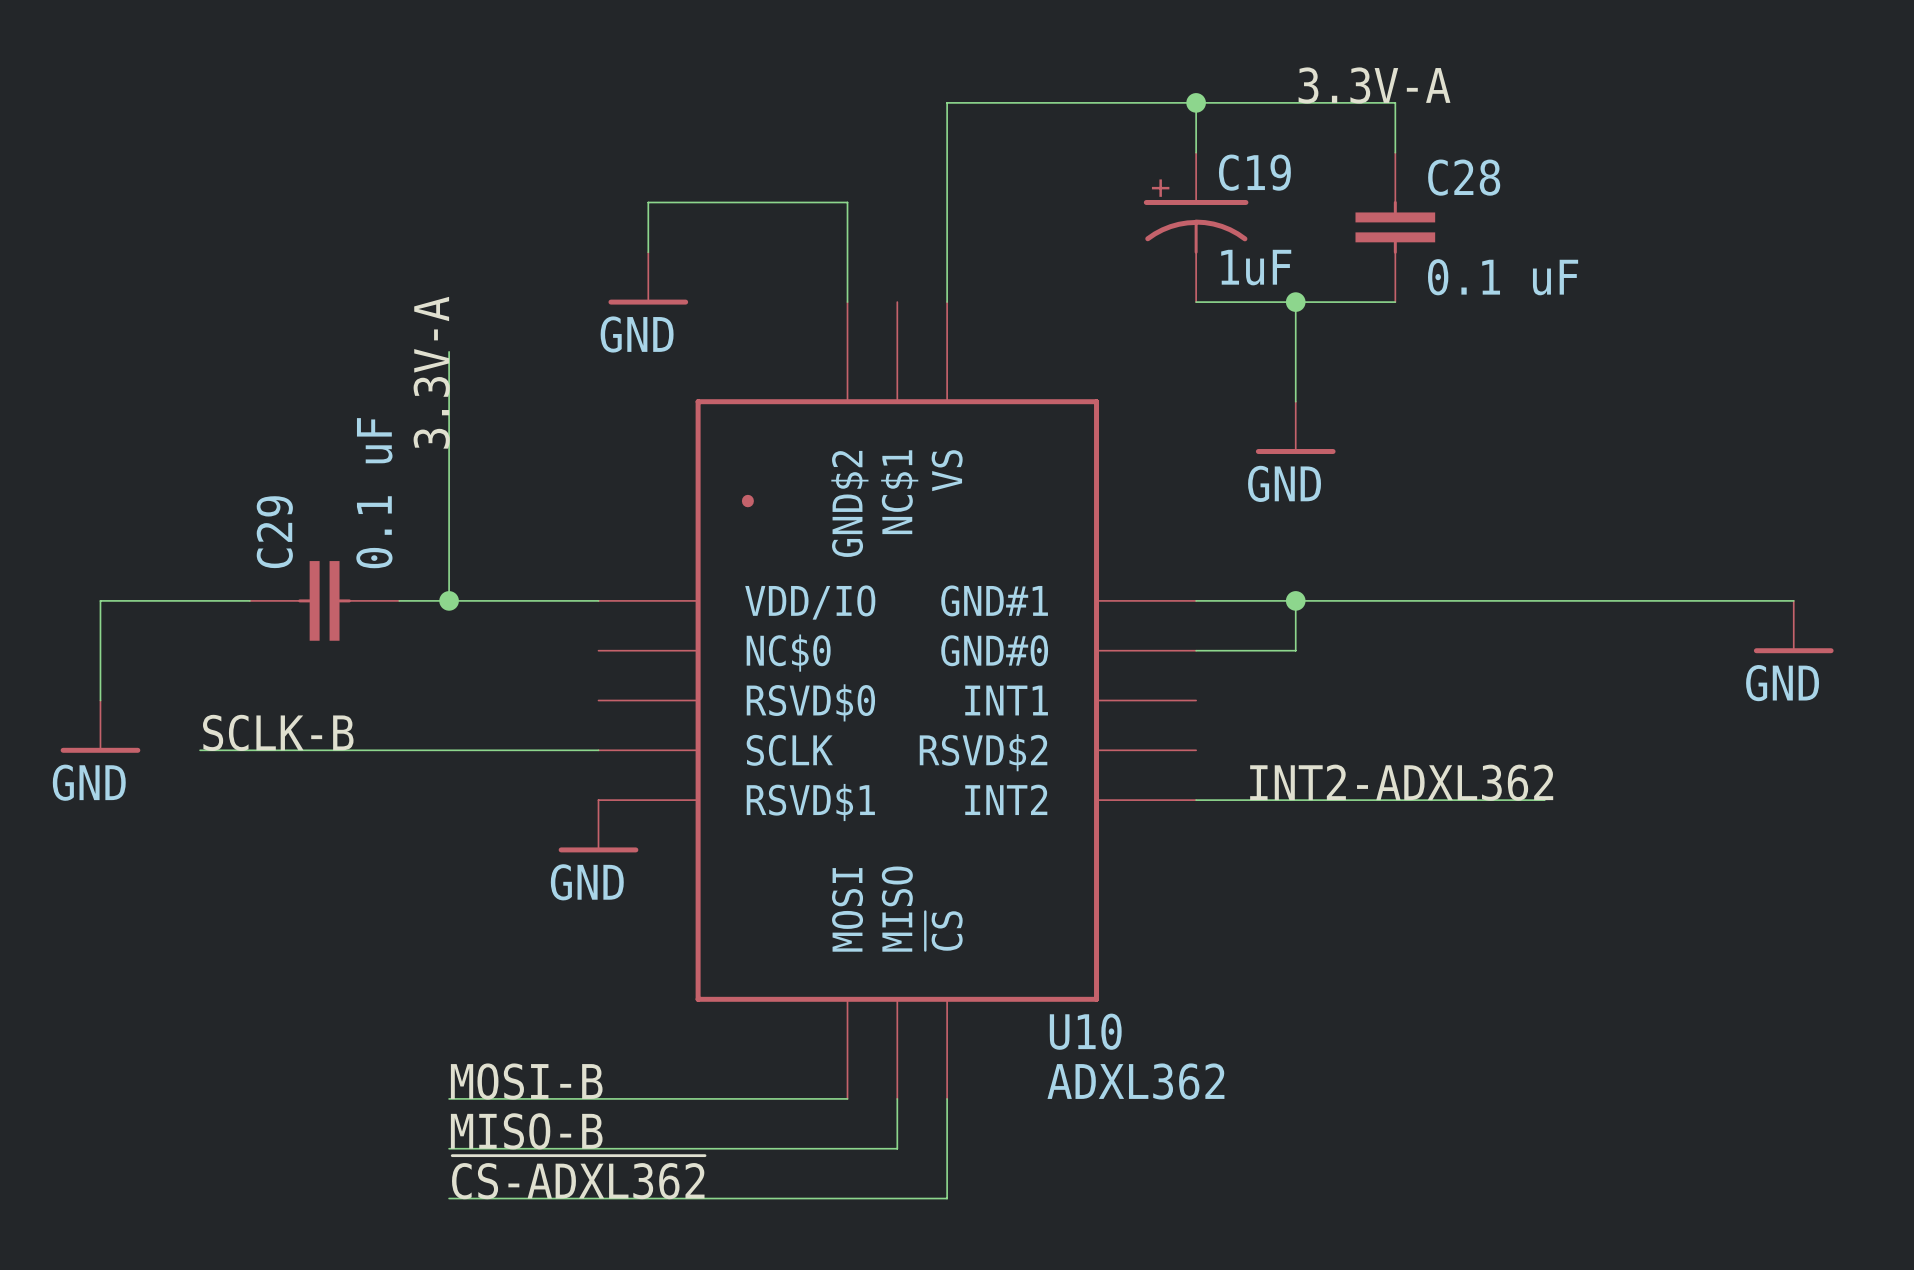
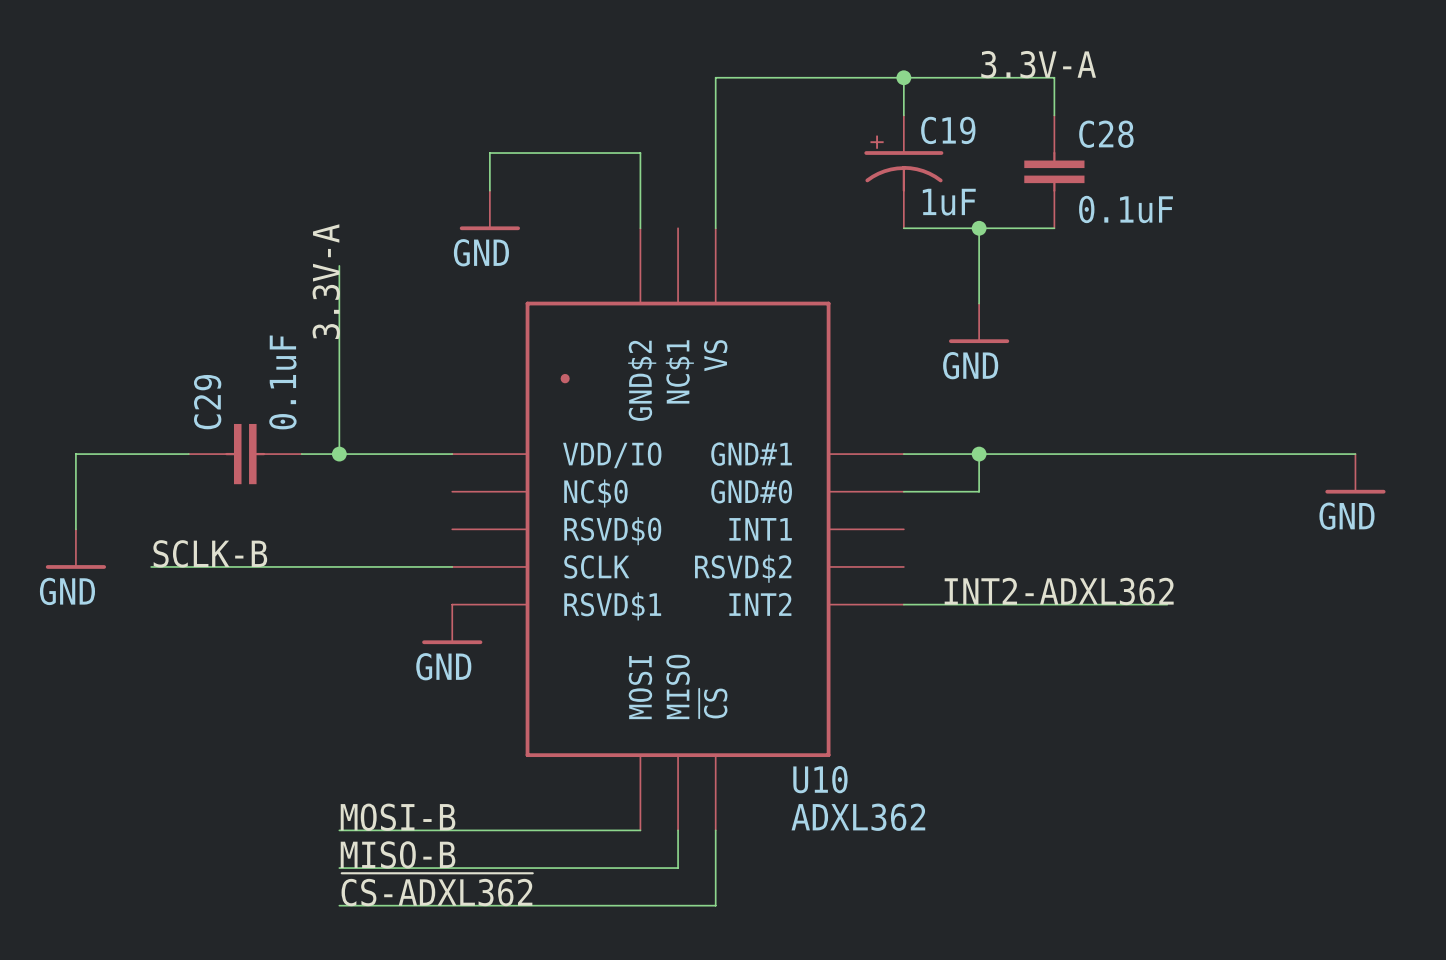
C28 value: 0.1 uF (1503, 277) -> 0.1uF (1126, 209)
C29 value: 0.1 uF (374, 493) -> 0.1uF (282, 382)

